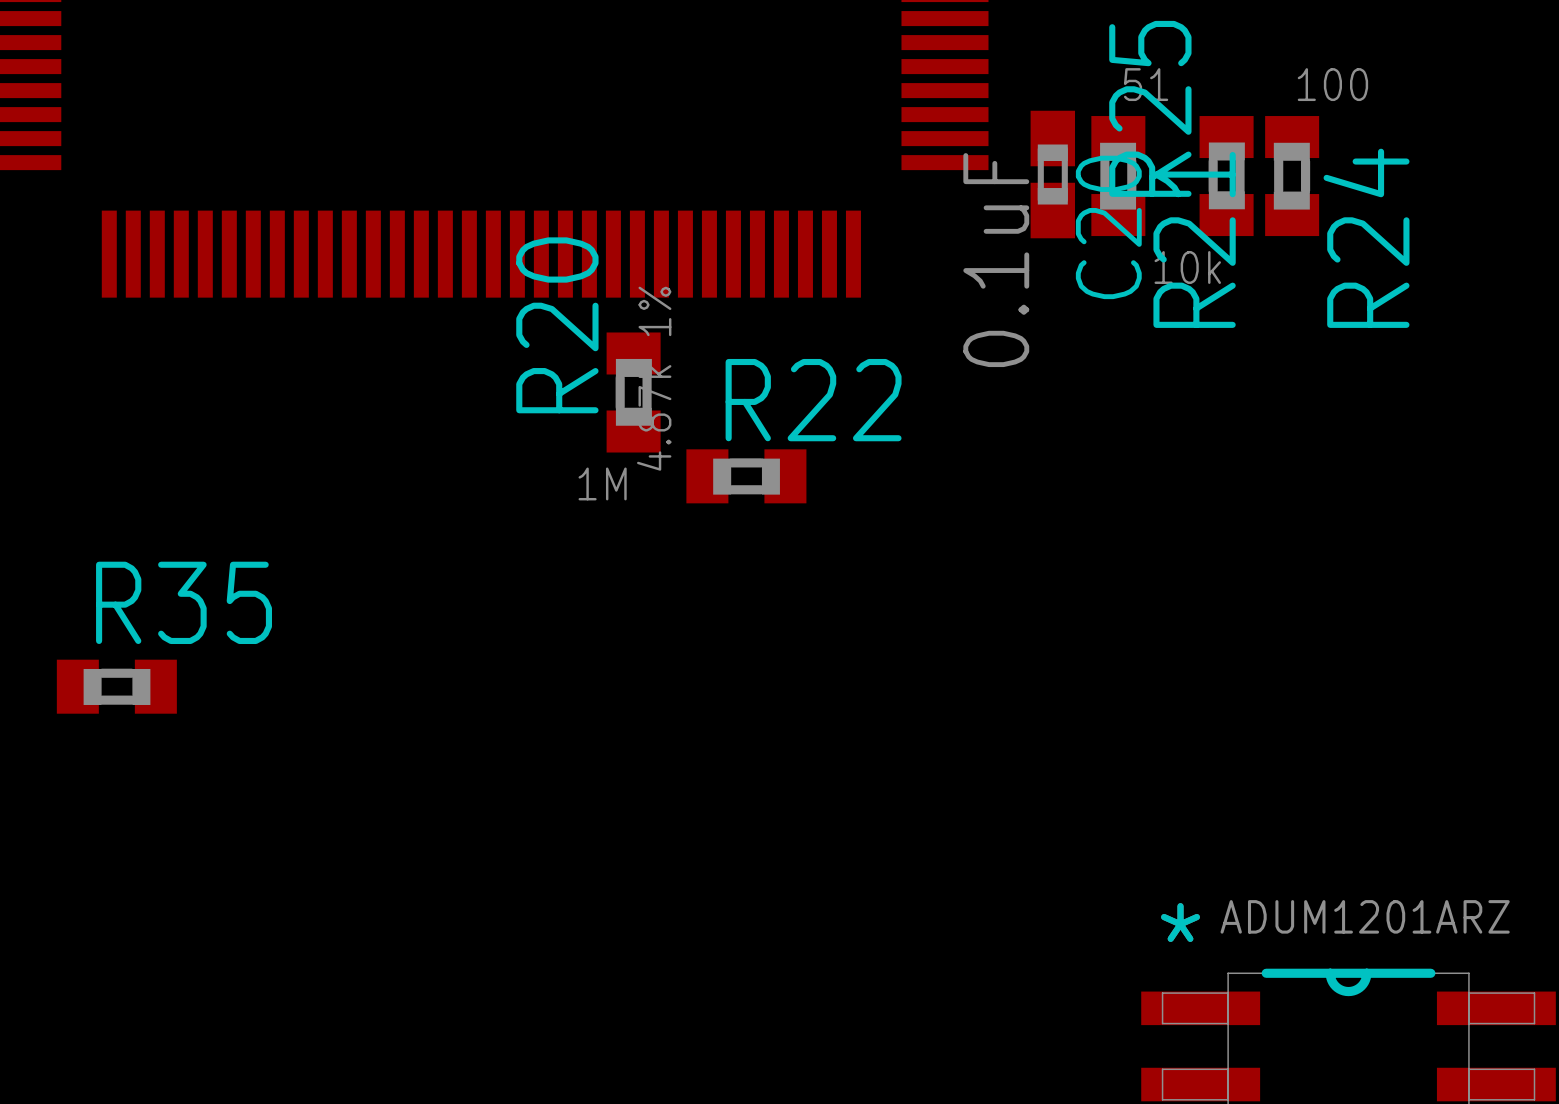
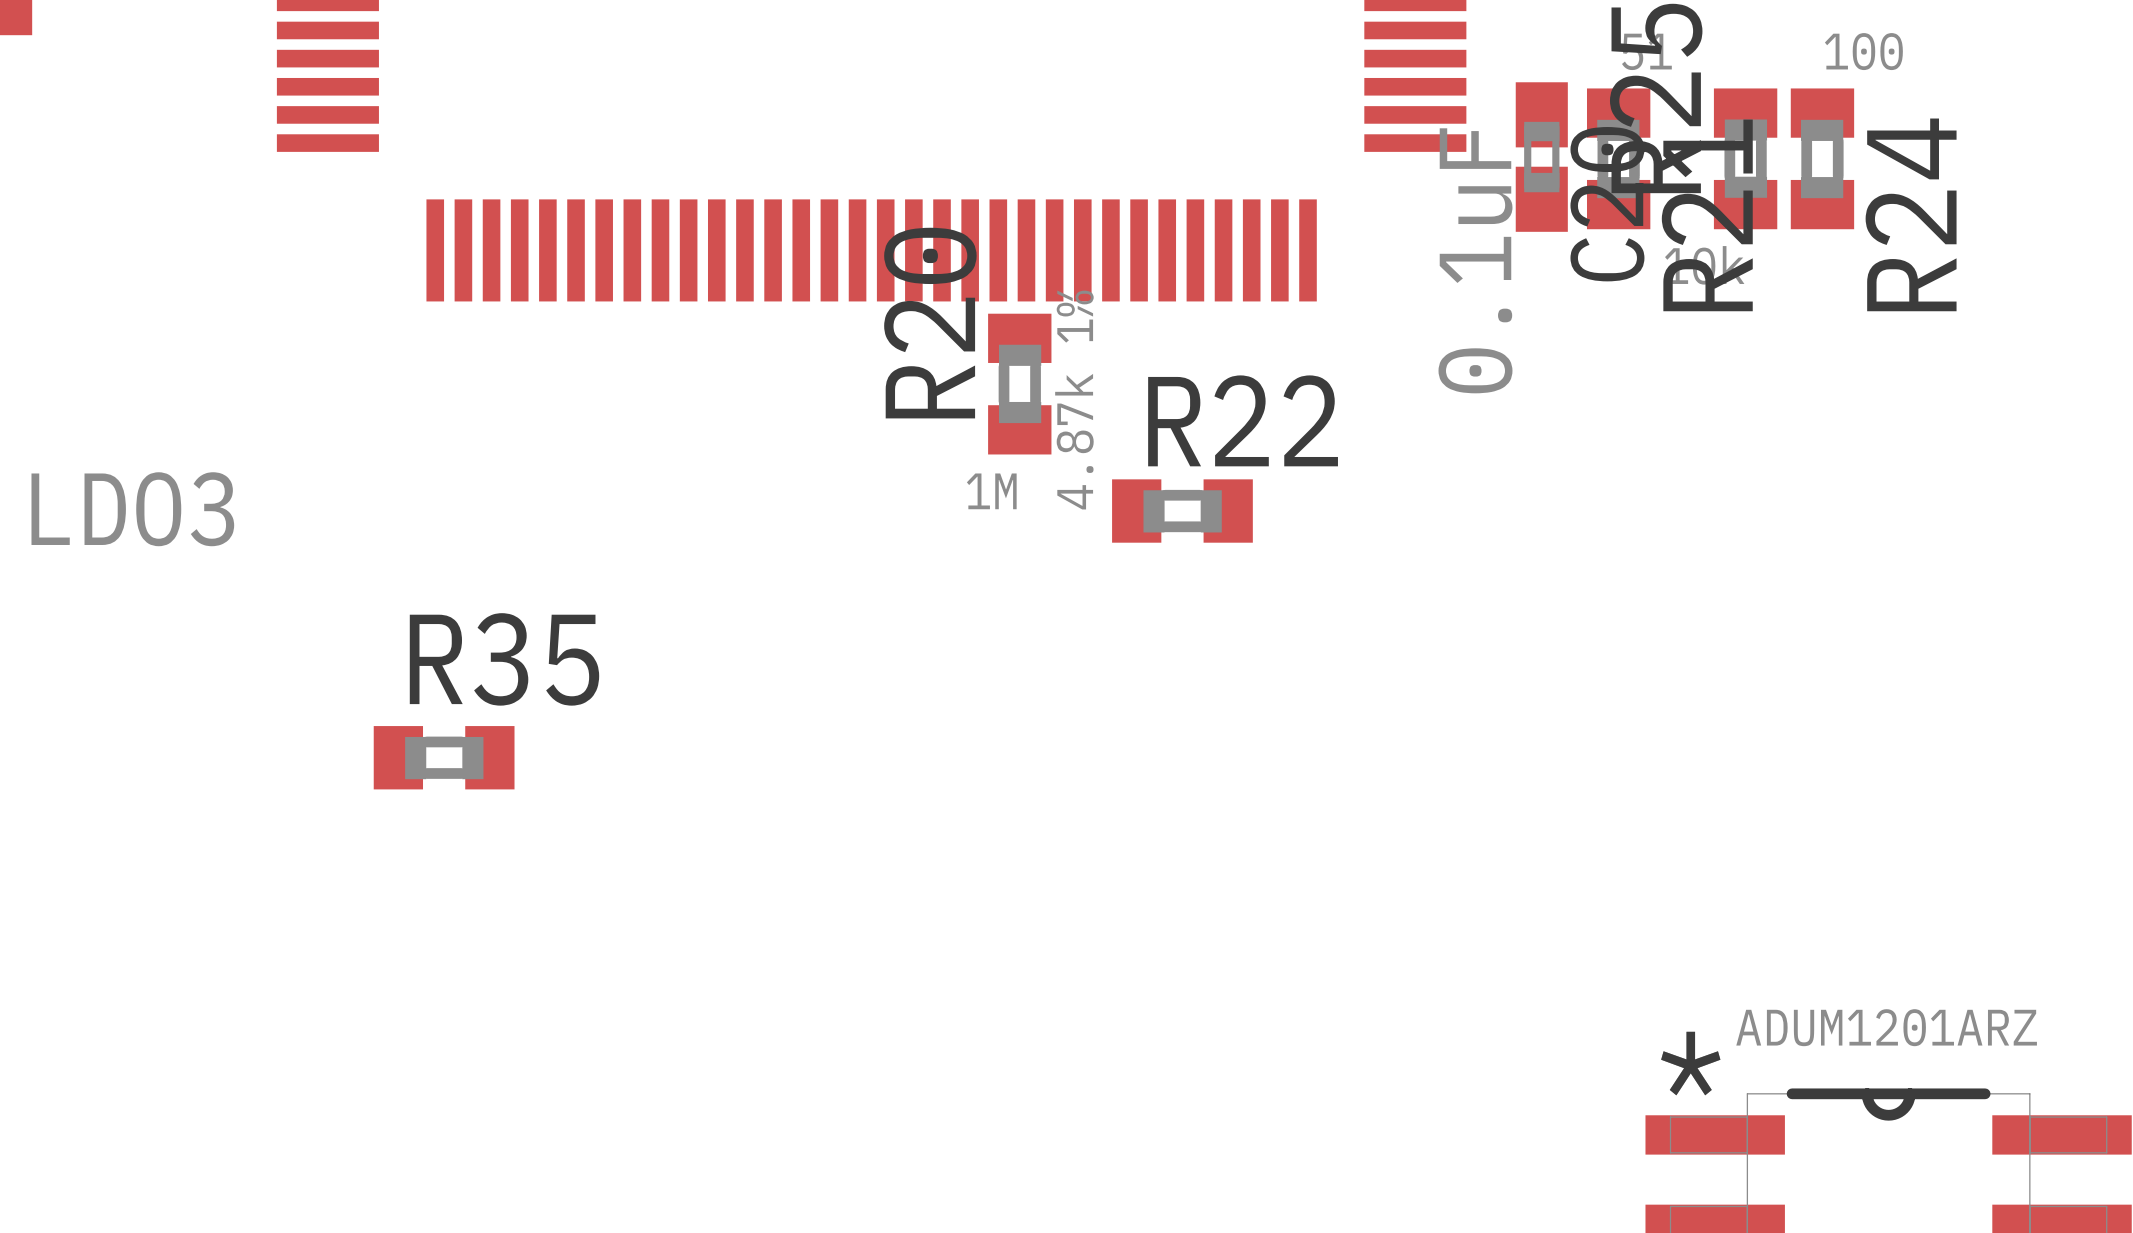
R20 position: (633, 392) -> (1019, 384)

